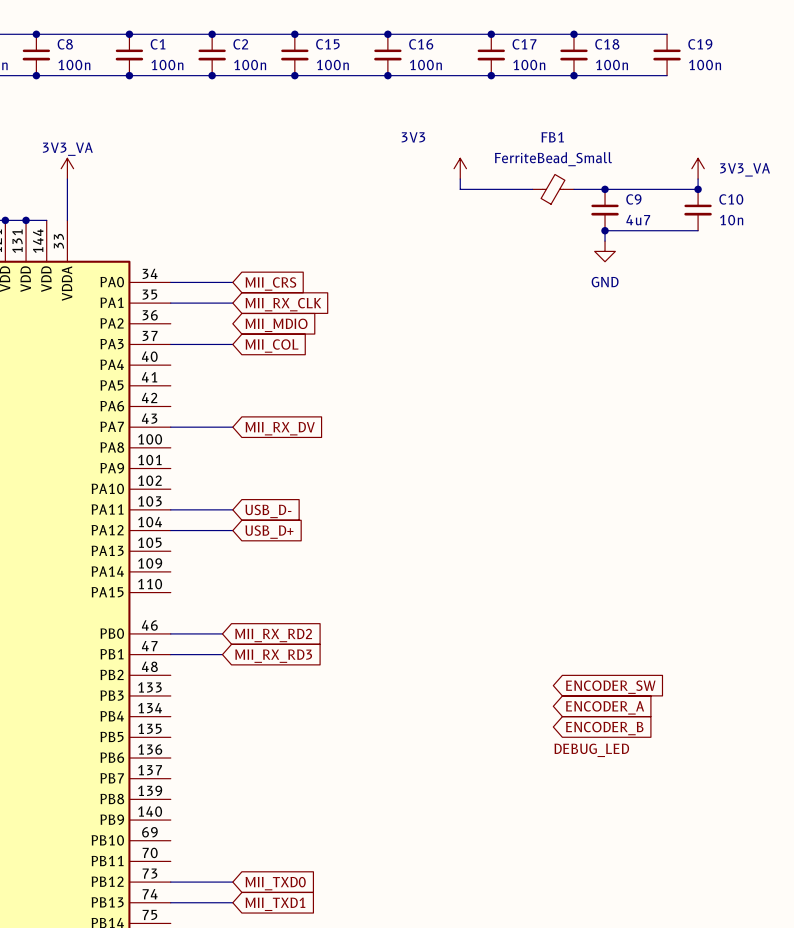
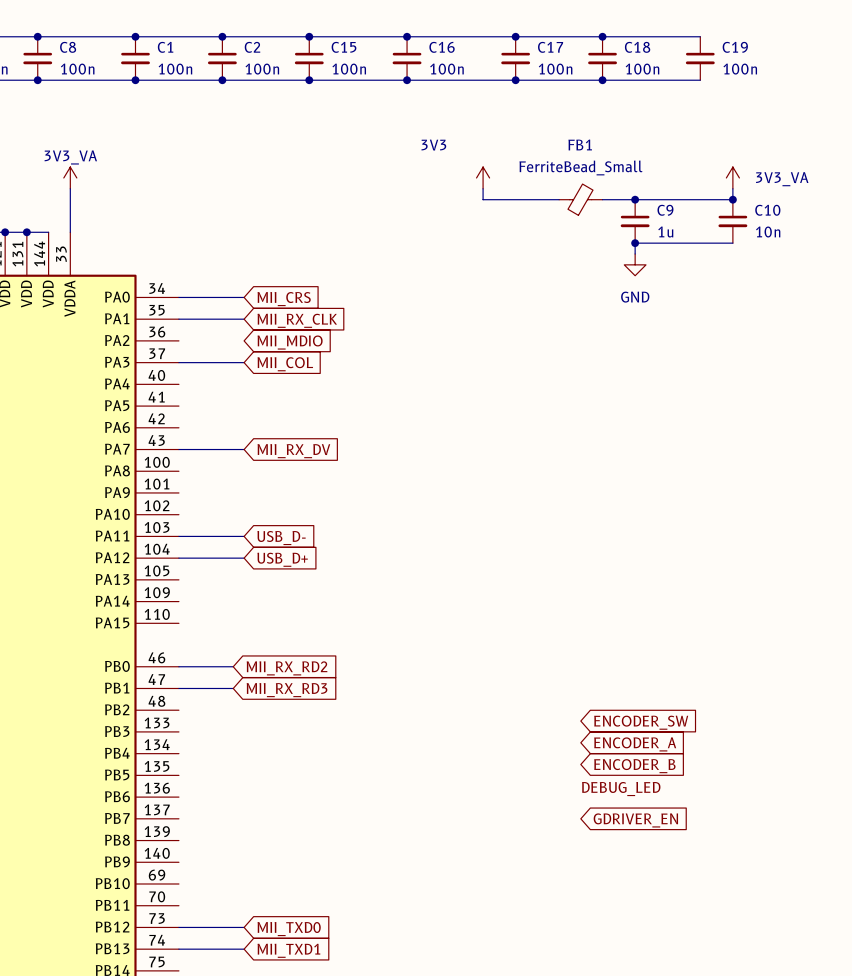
C9 value: 4u7 (638, 220) -> 1u (665, 231)
global label: none -> GDRIVER_EN (635, 820)

